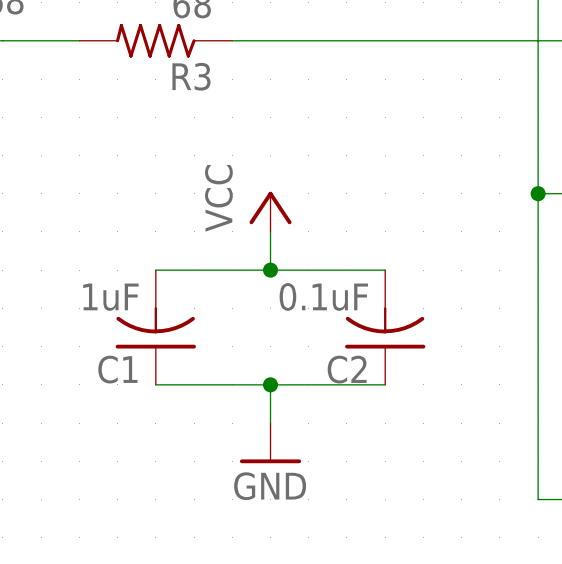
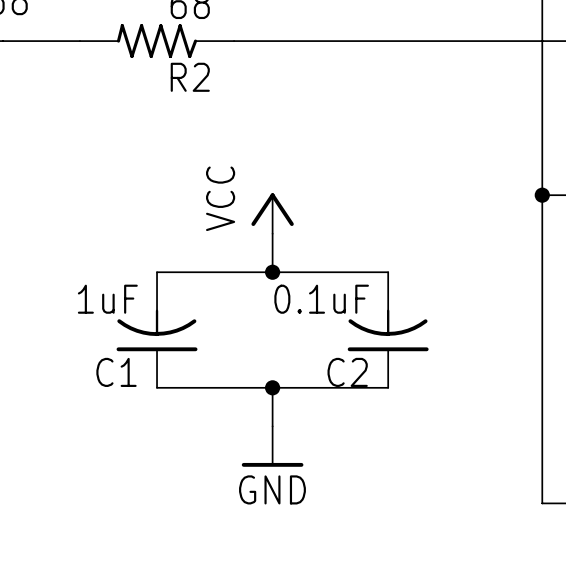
R3 name: R3 (191, 76) -> R2 (190, 77)

